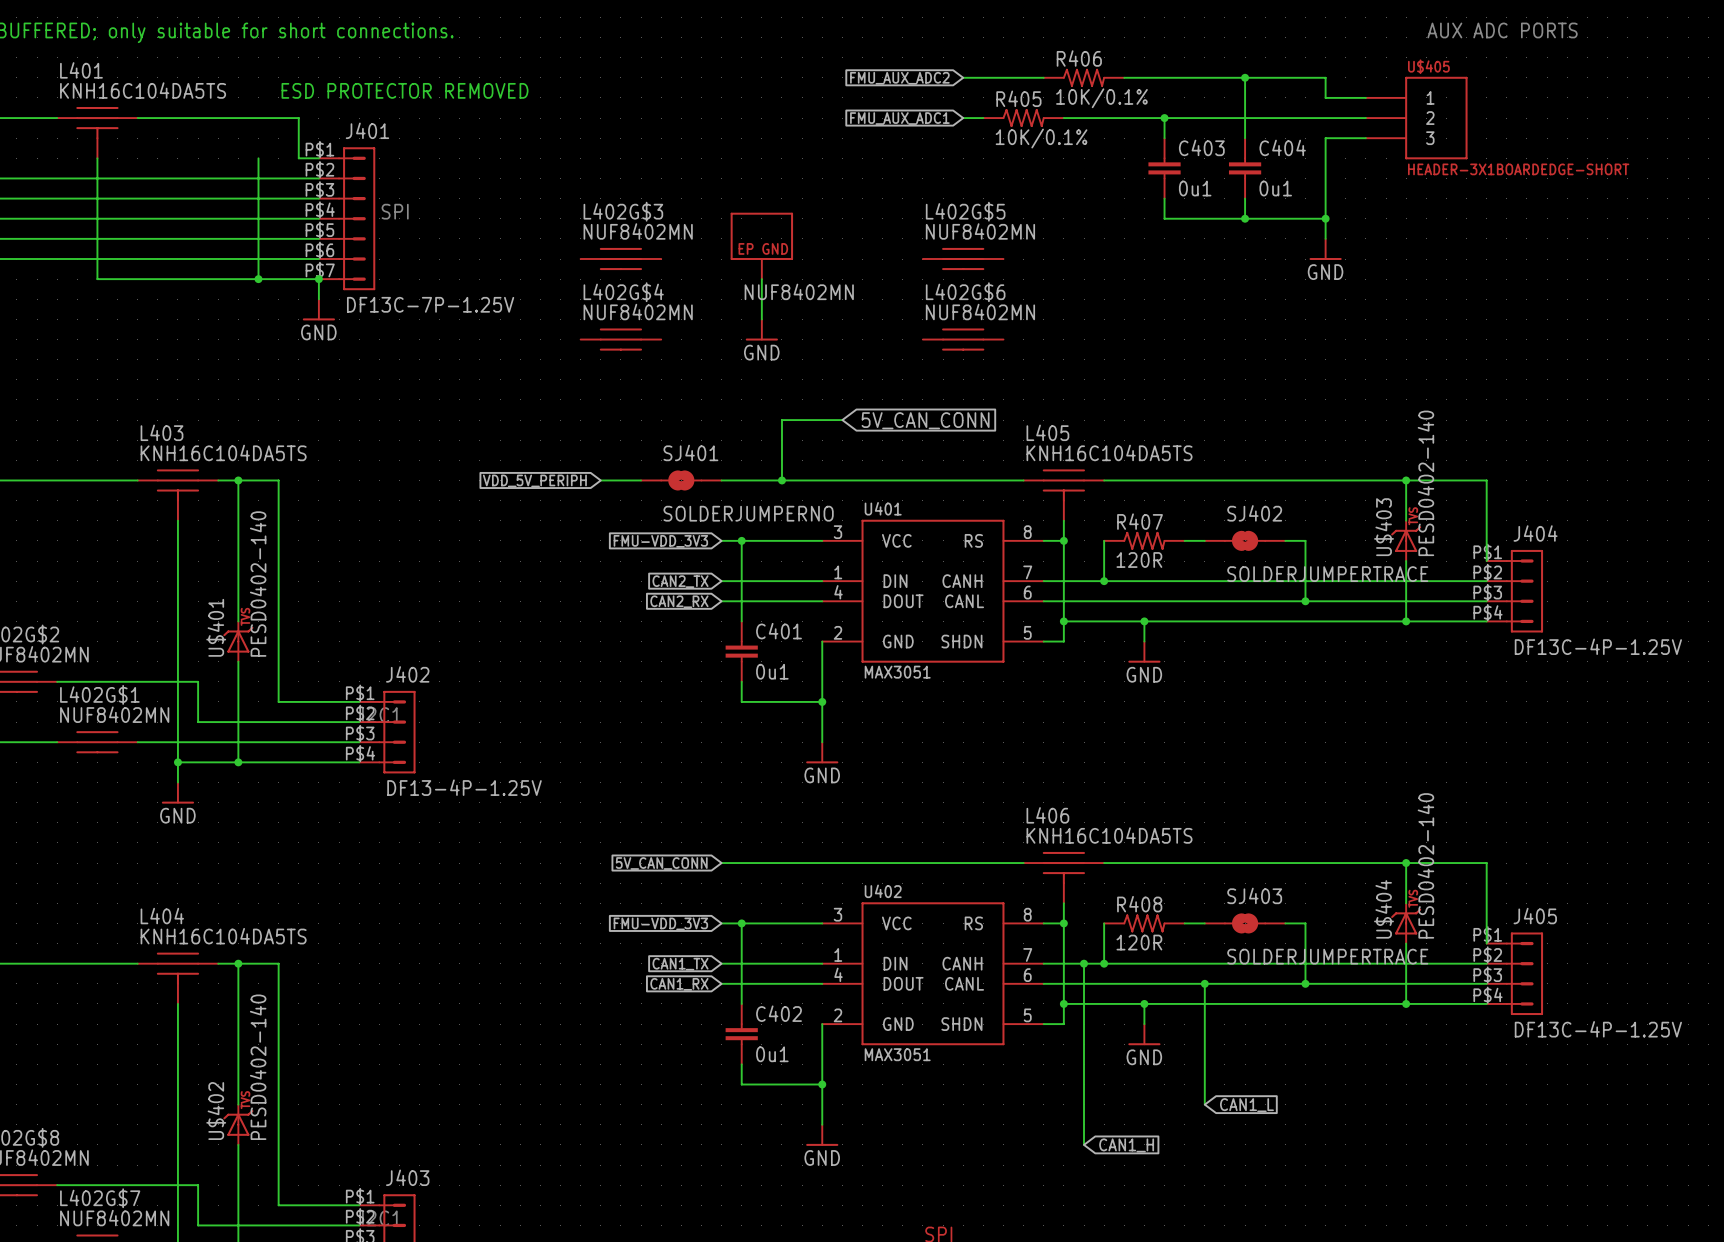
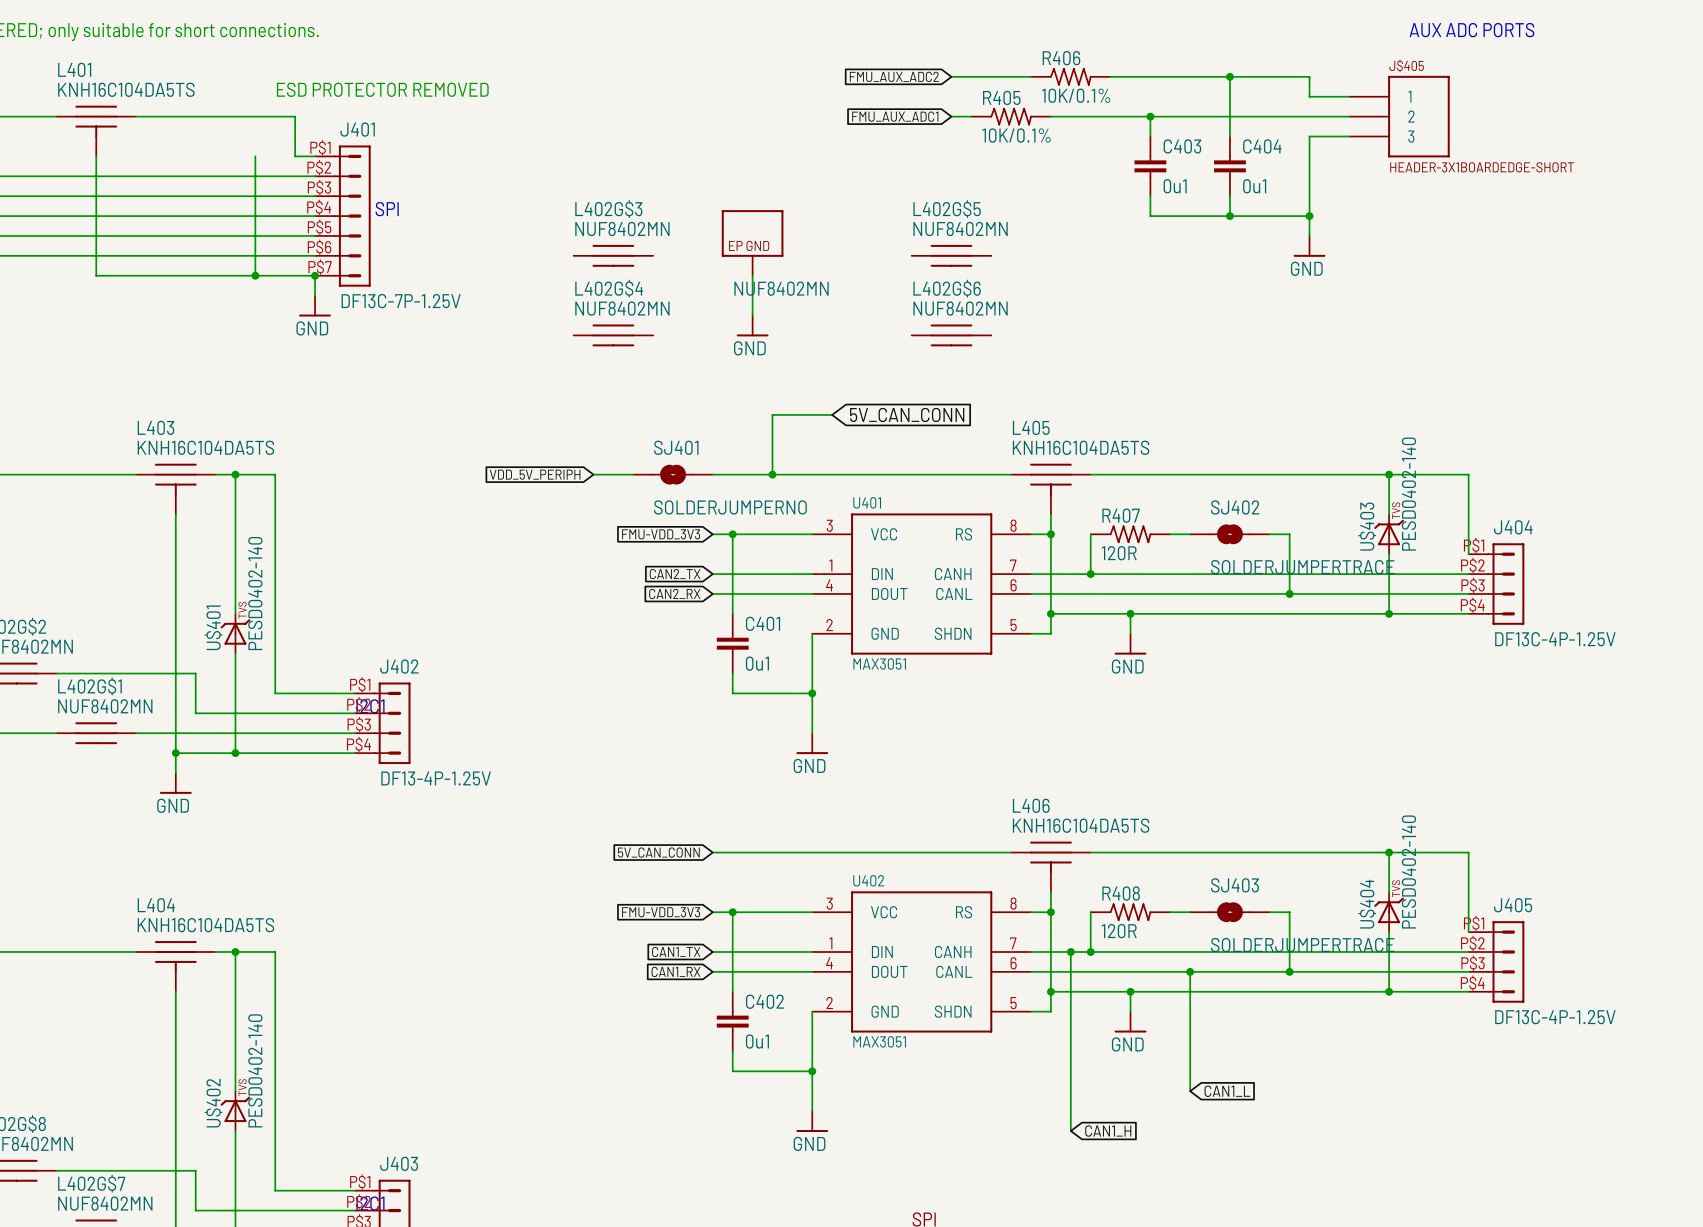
U$405 name: U$405 (1428, 66) -> J$405 (1406, 65)

